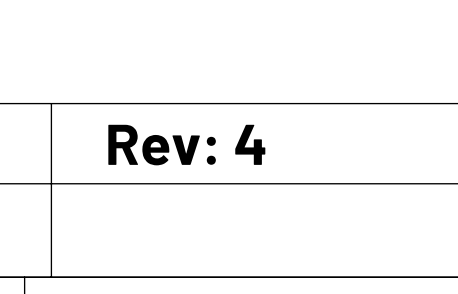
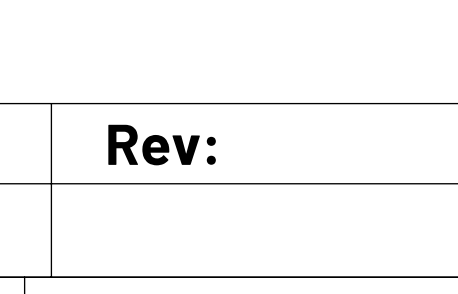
title block: Rev: 4 (186, 145) -> Rev: (162, 145)

